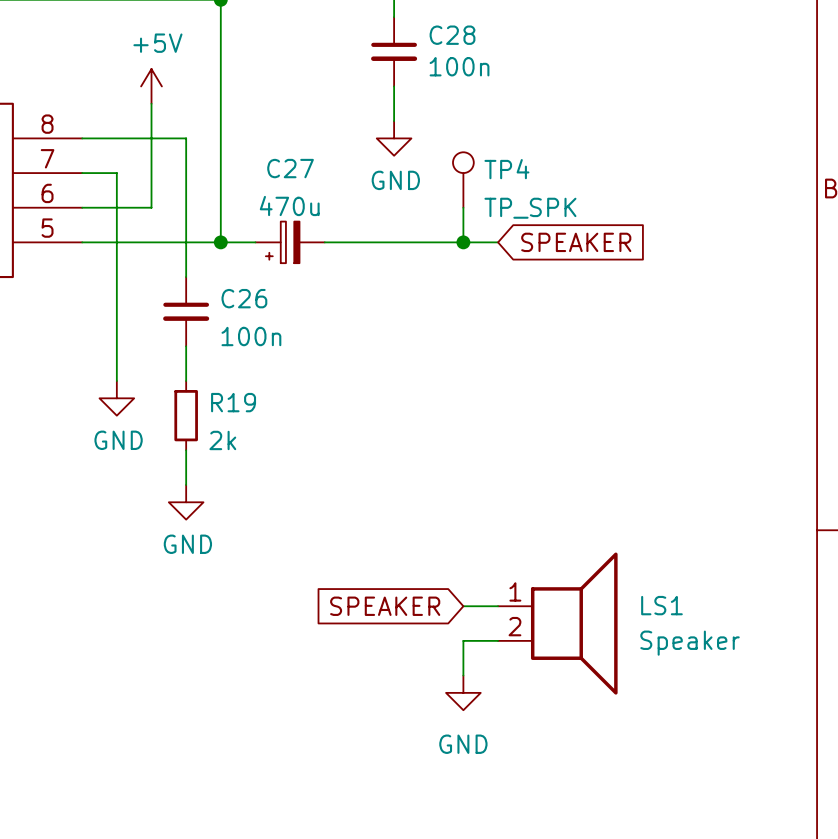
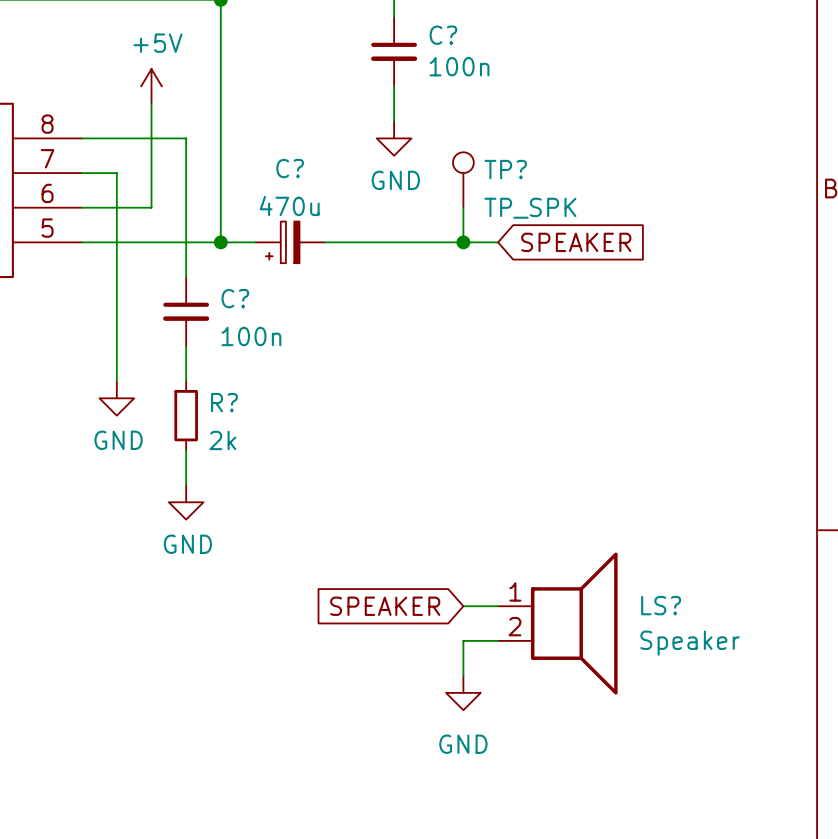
C28 name: C28 (452, 35) -> C? (443, 35)
C27 name: C27 (290, 168) -> C? (290, 168)
TP4 name: TP4 (506, 169) -> TP? (505, 169)
C26 name: C26 (244, 298) -> C? (235, 298)
R19 name: R19 (233, 402) -> R? (224, 402)
LS1 name: LS1 (661, 605) -> LS? (661, 605)

